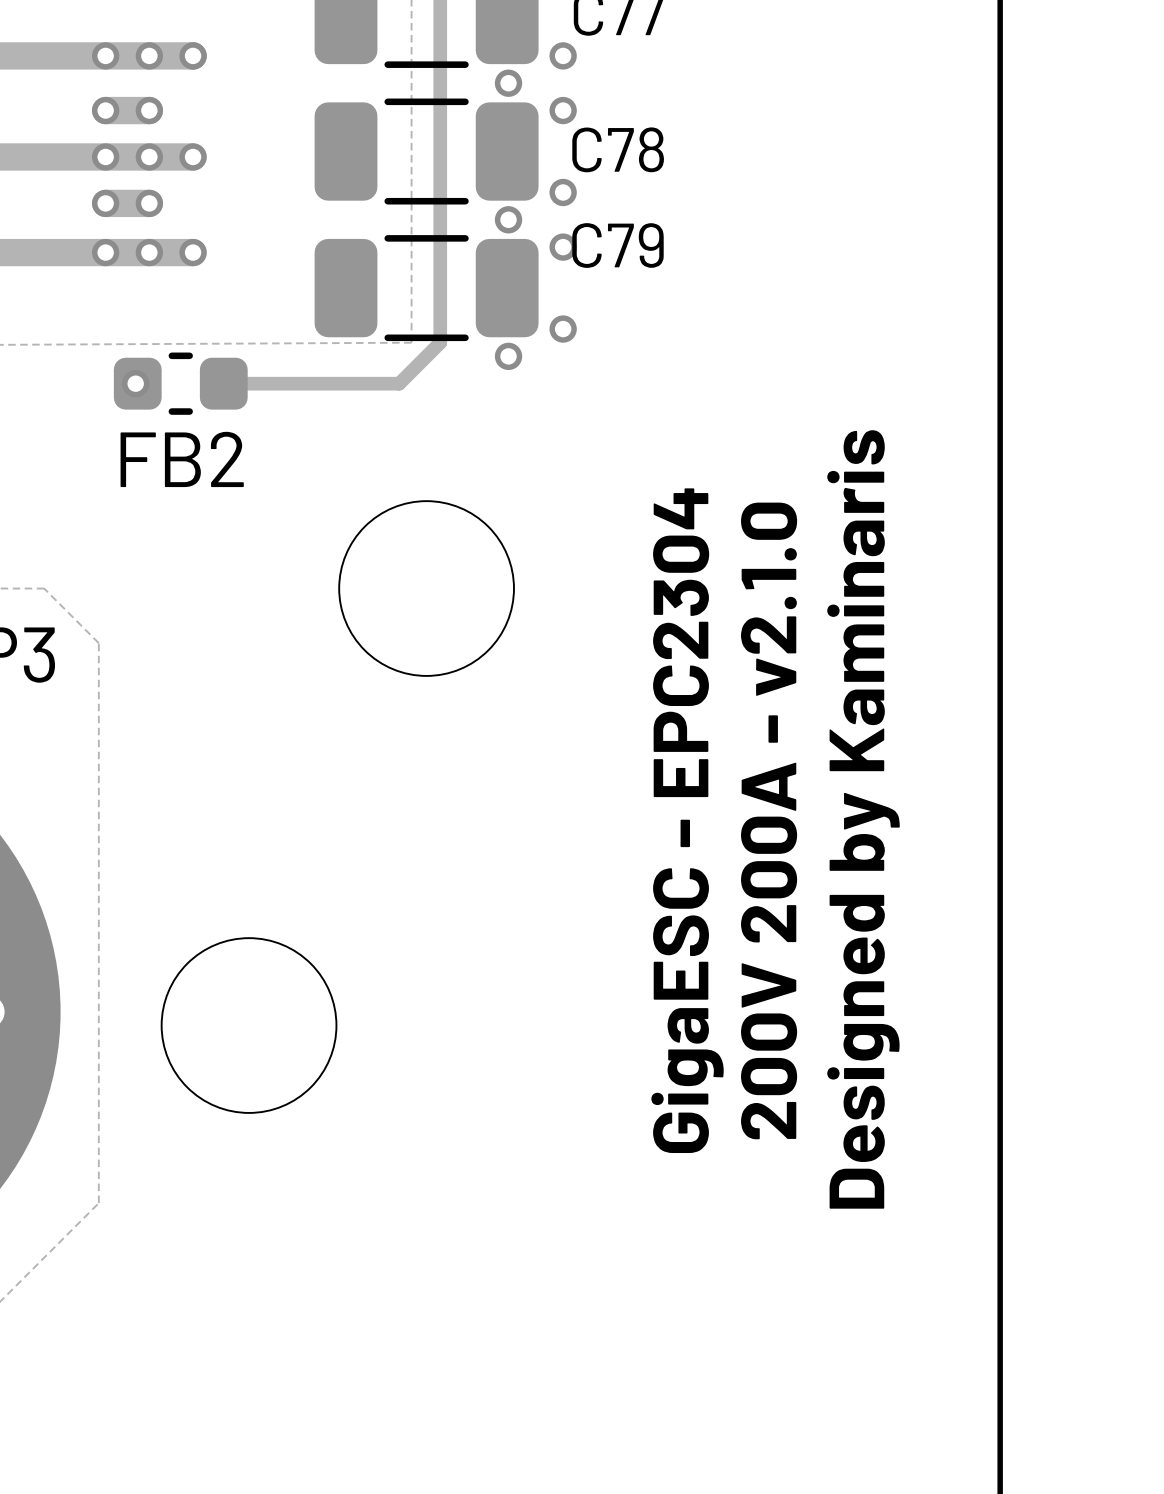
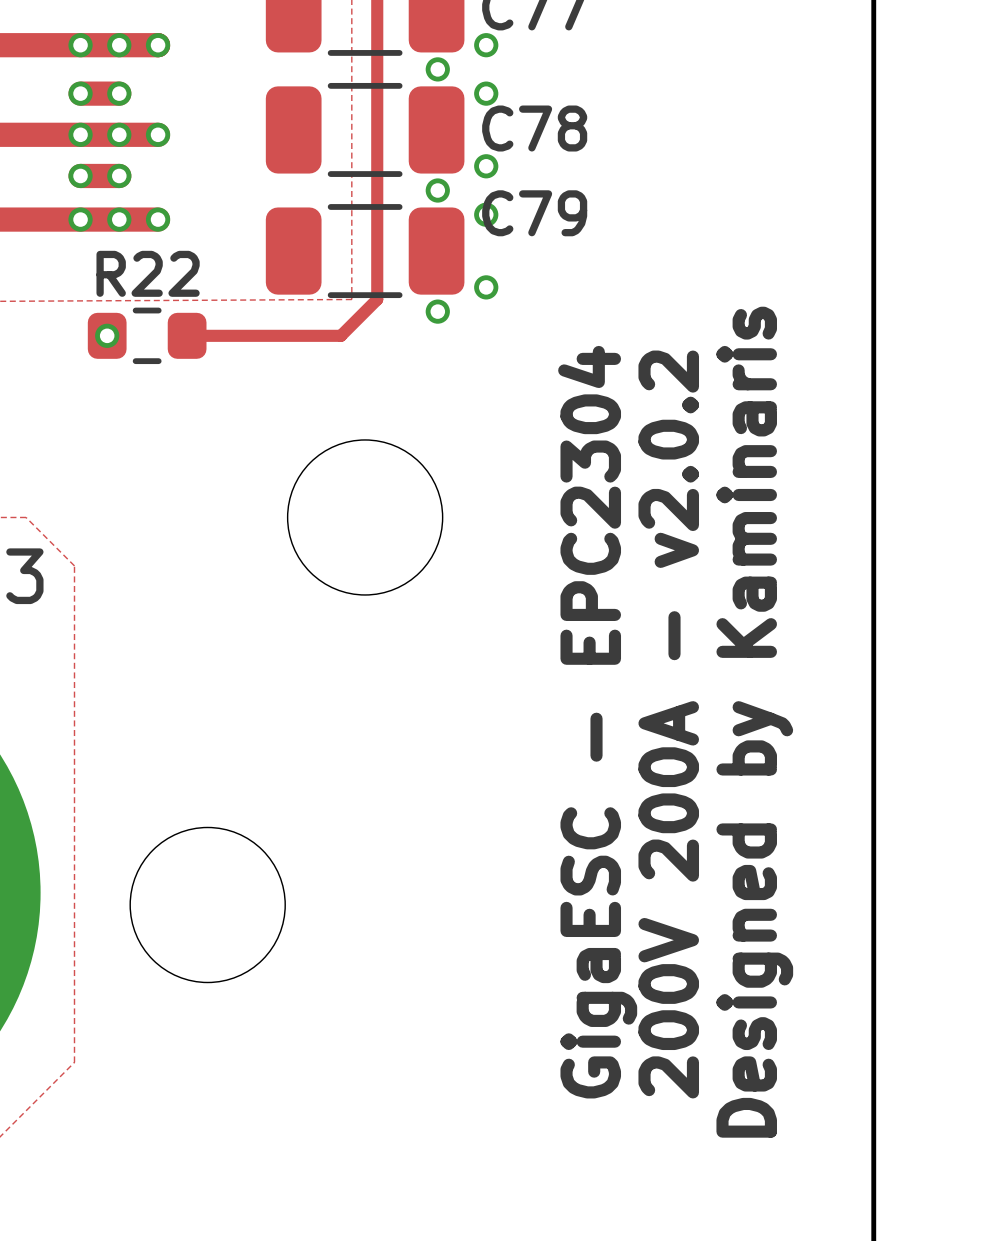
FB2: (180, 383) -> none
R22: none -> (147, 335)
text: 200V 200A - v2.1.0 (769, 820) -> 200V 200A - v2.0.2 (668, 724)

